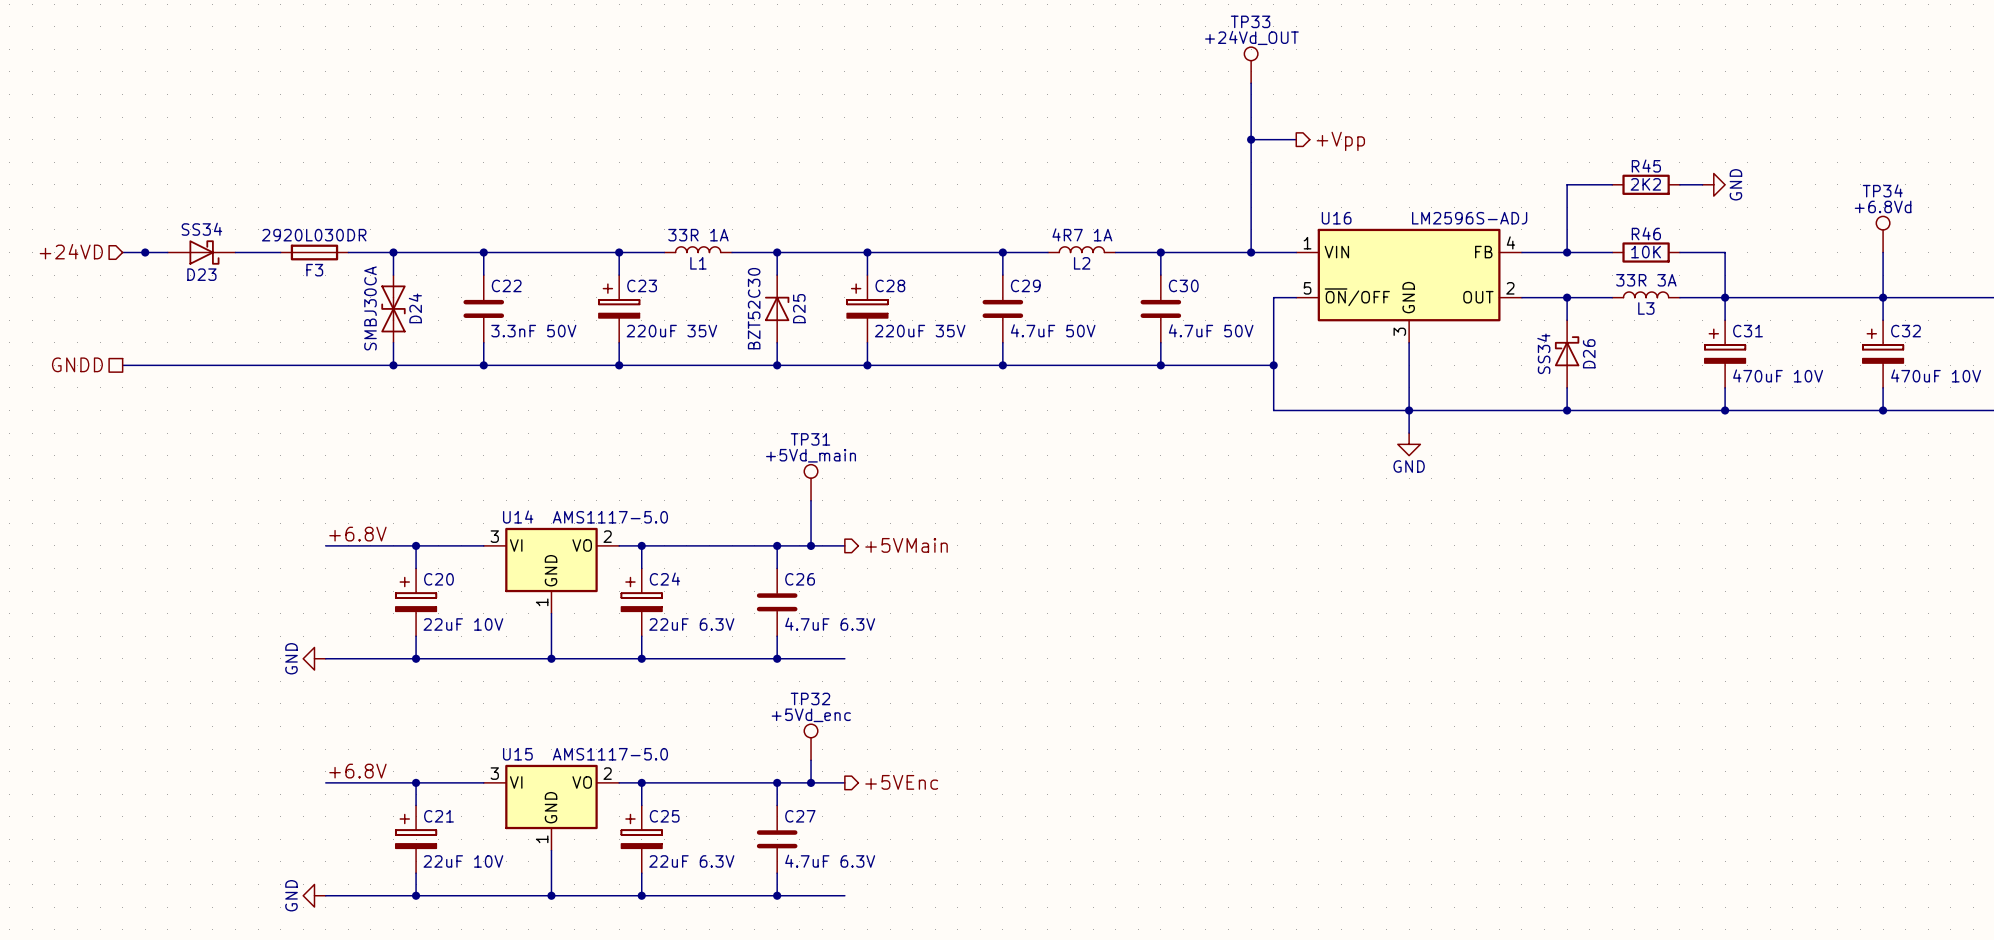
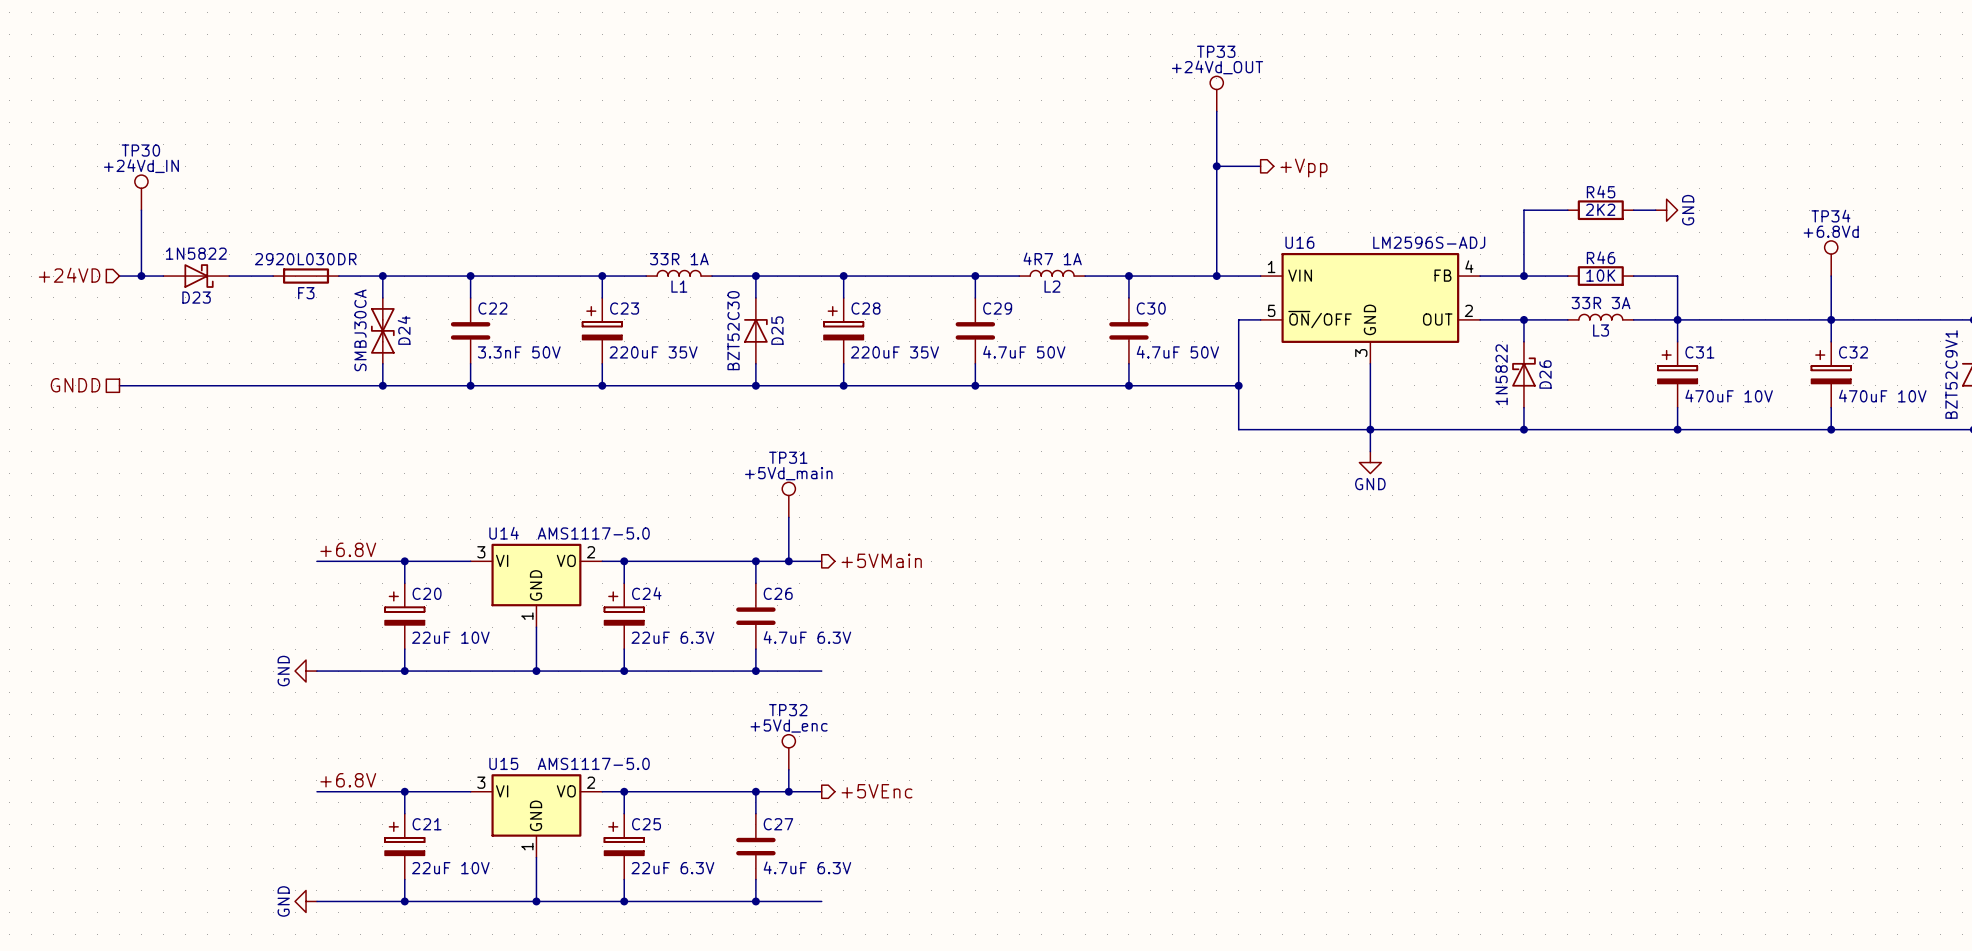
TP30: none -> +24Vd_IN (141, 192)
wire: none -> (141, 210) (141, 276)
D23 value: SS34 (201, 229) -> 1N5822 (196, 253)
D26 value: SS34 (1543, 353) -> 1N5822 (1501, 374)

